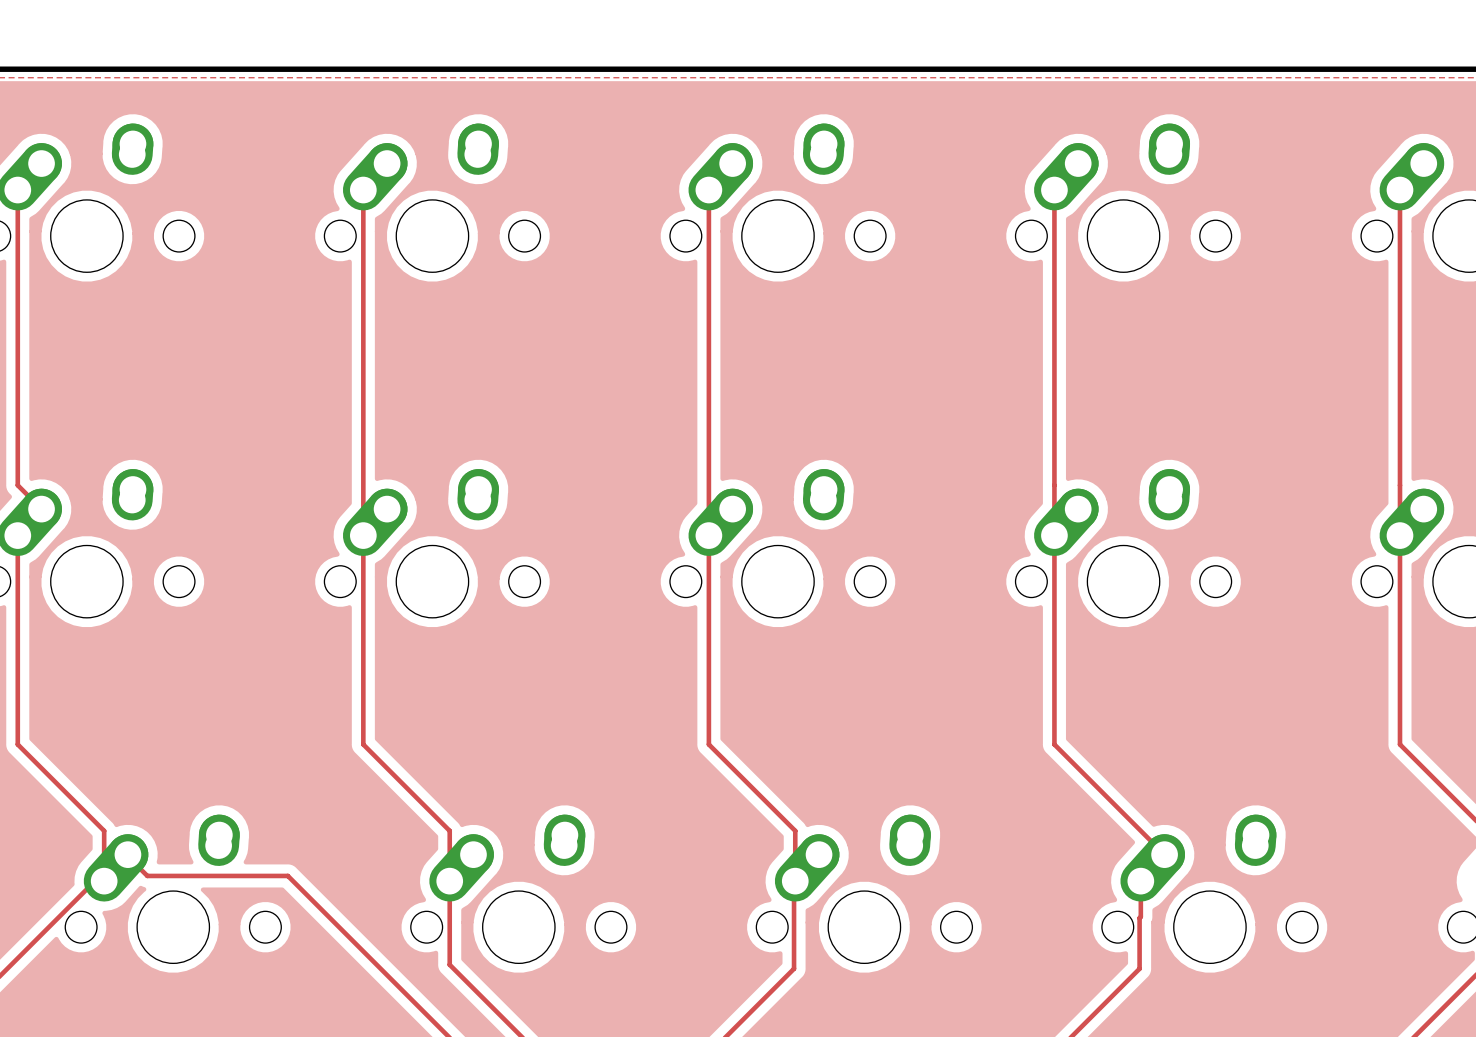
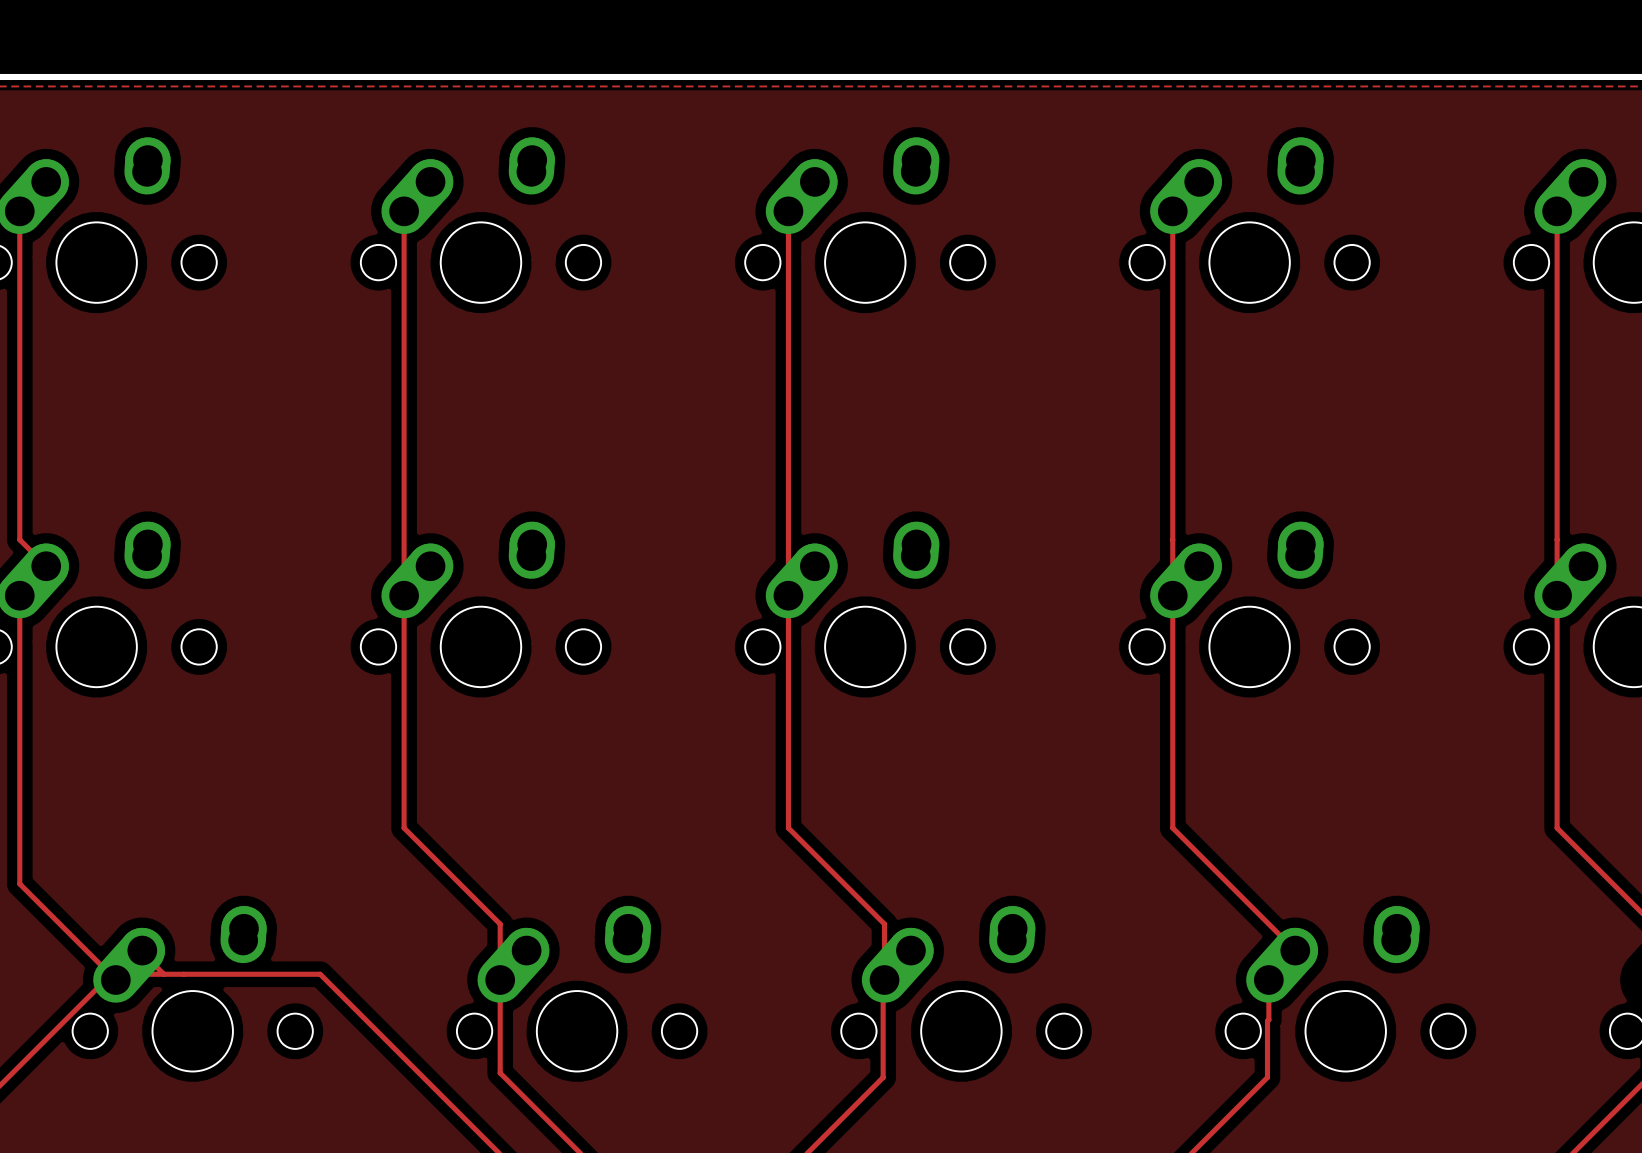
track: (17, 744) (104, 830) (104, 881) -> (19, 828) (19, 883) (115, 980) (121, 974) (163, 974)

